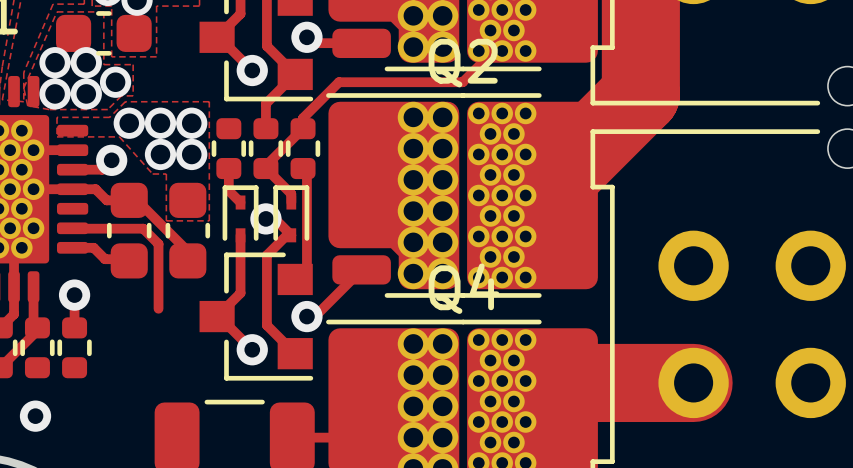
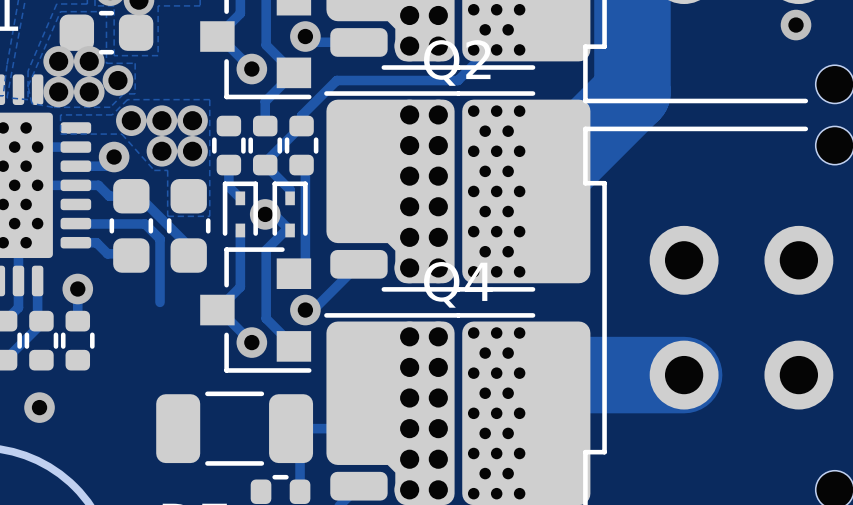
via: none -> (796, 25)

